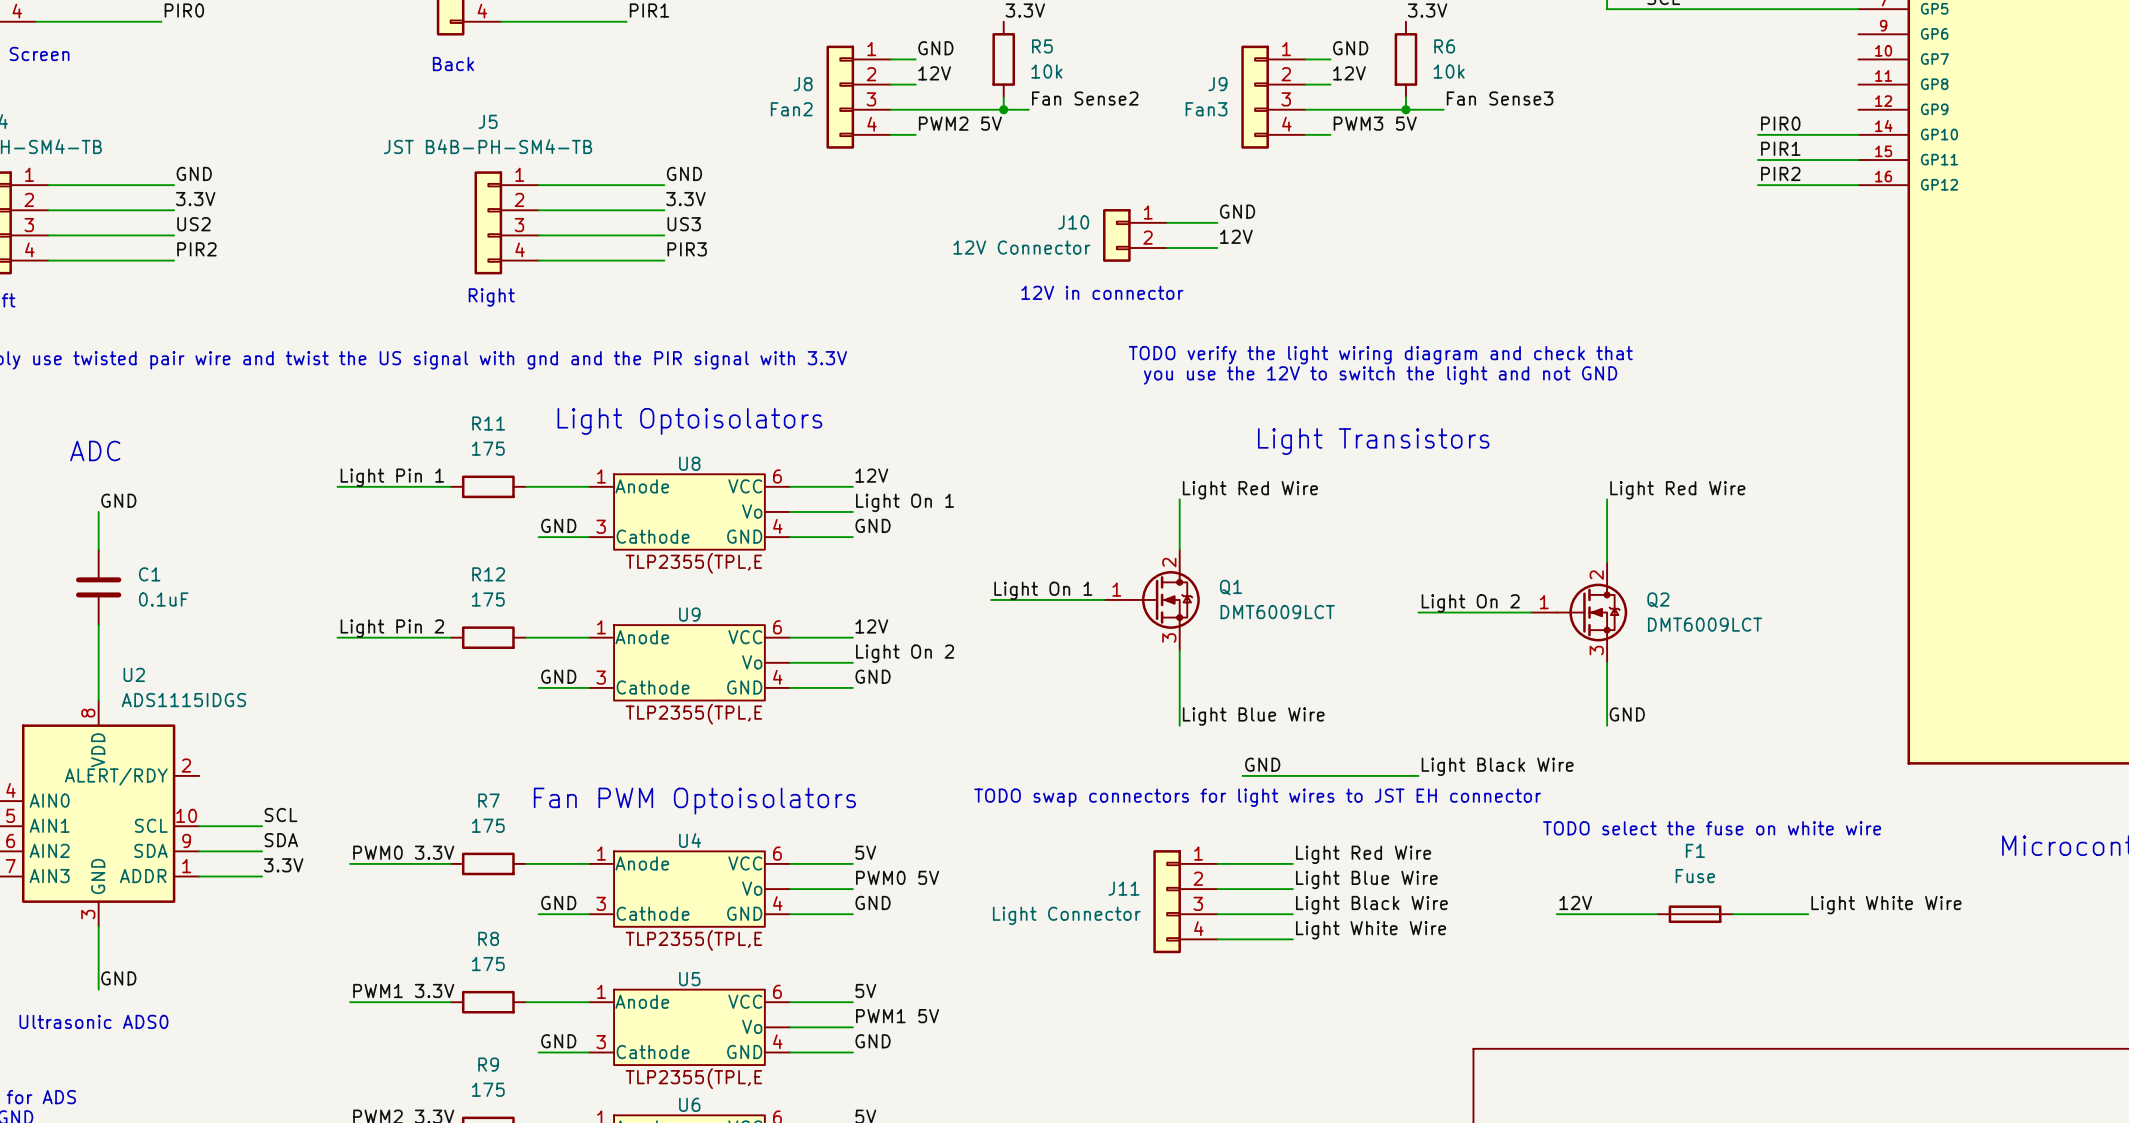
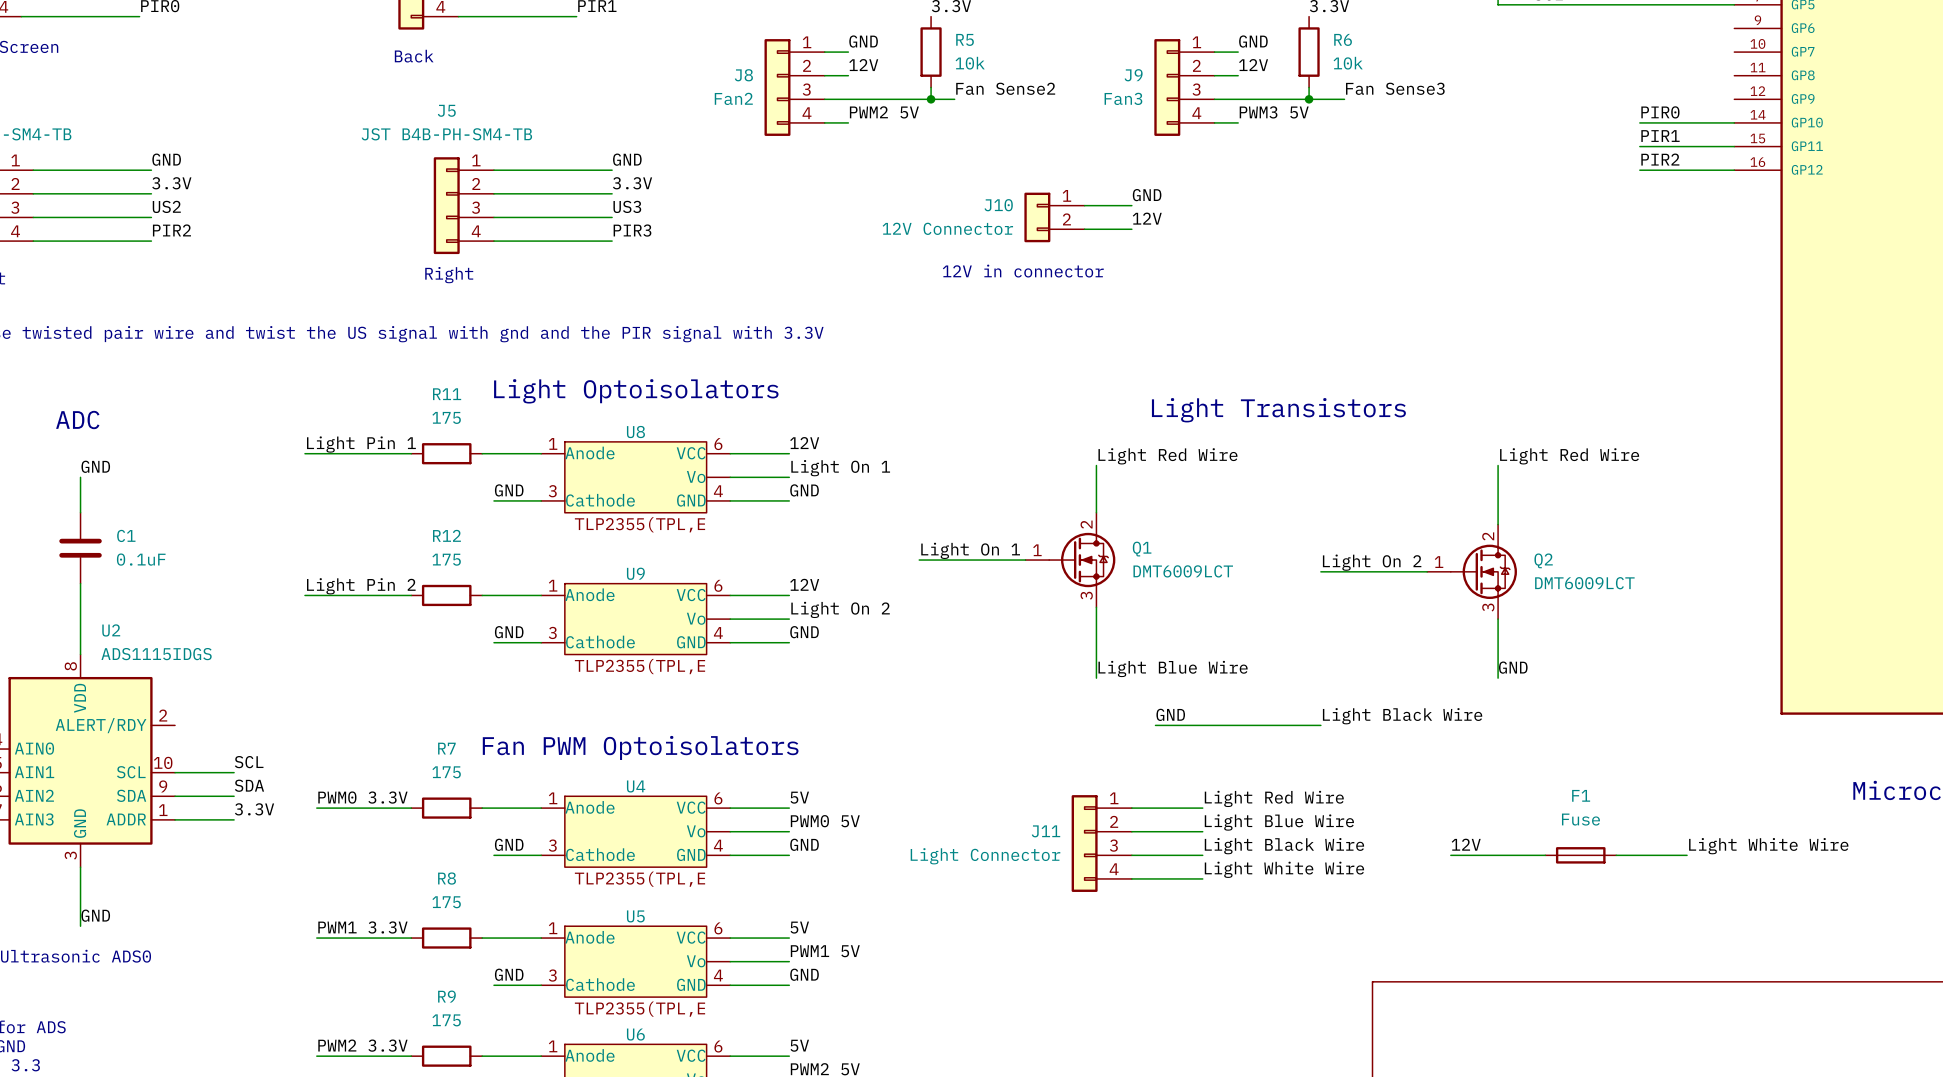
text: TODO verify the light wiring diagram and check that (1380, 355) -> none
text: you use the 12V to switch the light and not GND (1380, 375) -> none
text: TODO swap connectors for light wires to JST EH connector (1257, 797) -> none
text: TODO select the fuse on white wire (1712, 828) -> none

